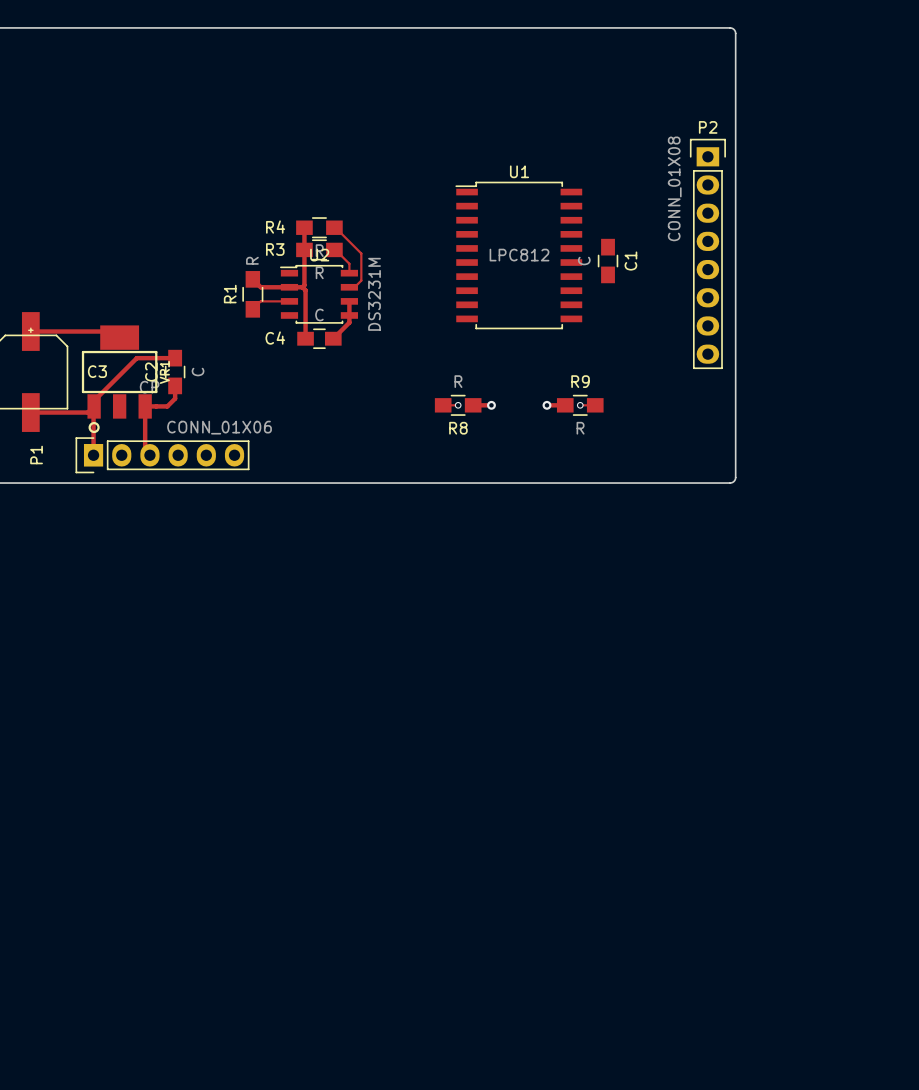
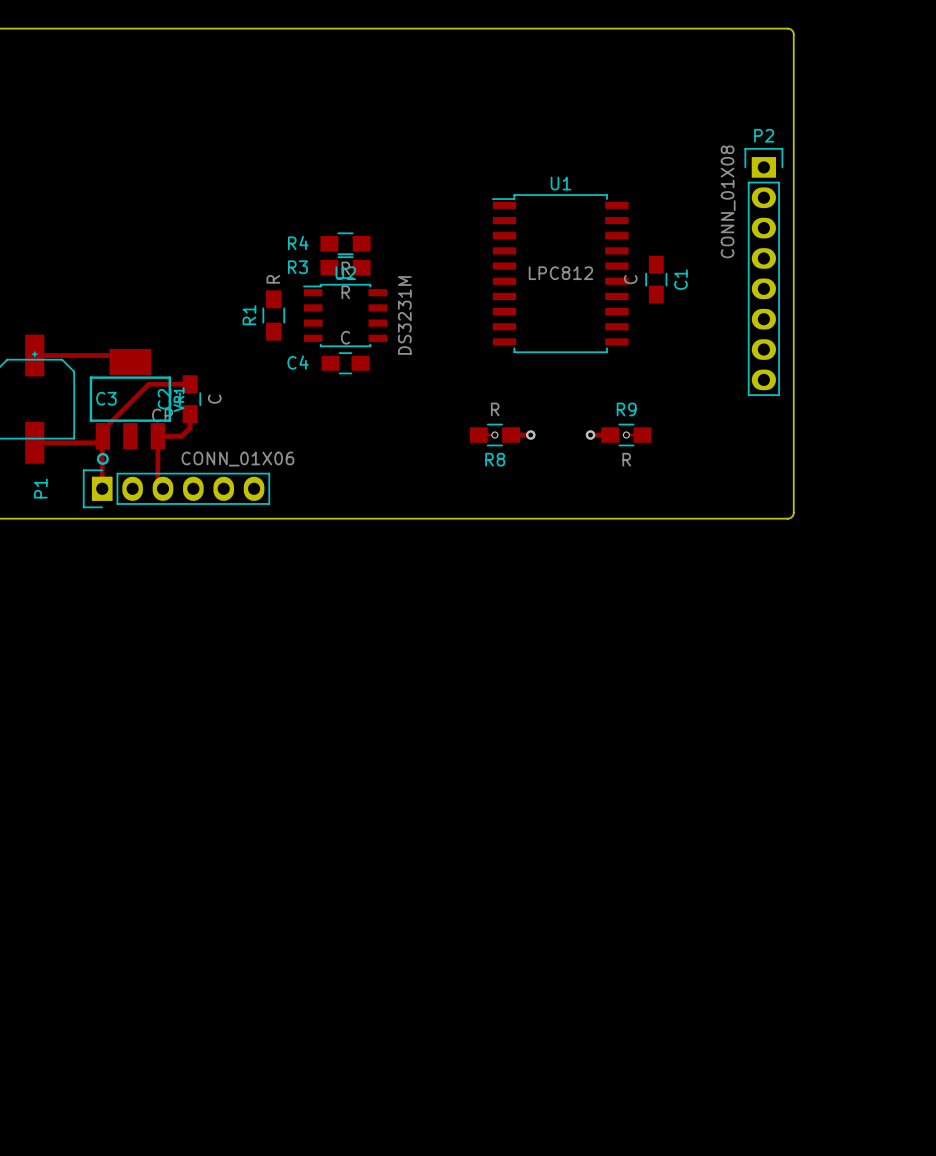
track: (304, 227) (304, 285) (302, 287) -> none
track: (334, 227) (361, 253) (361, 280) (354, 287) (349, 287) -> none
track: (334, 249) (349, 263) (349, 273) -> none
track: (252, 279) (260, 287) (302, 287) -> none
track: (302, 287) (305, 290) (305, 338) -> none
track: (289, 301) (260, 301) (252, 309) -> none
track: (349, 301) (349, 322) (333, 338) -> none

